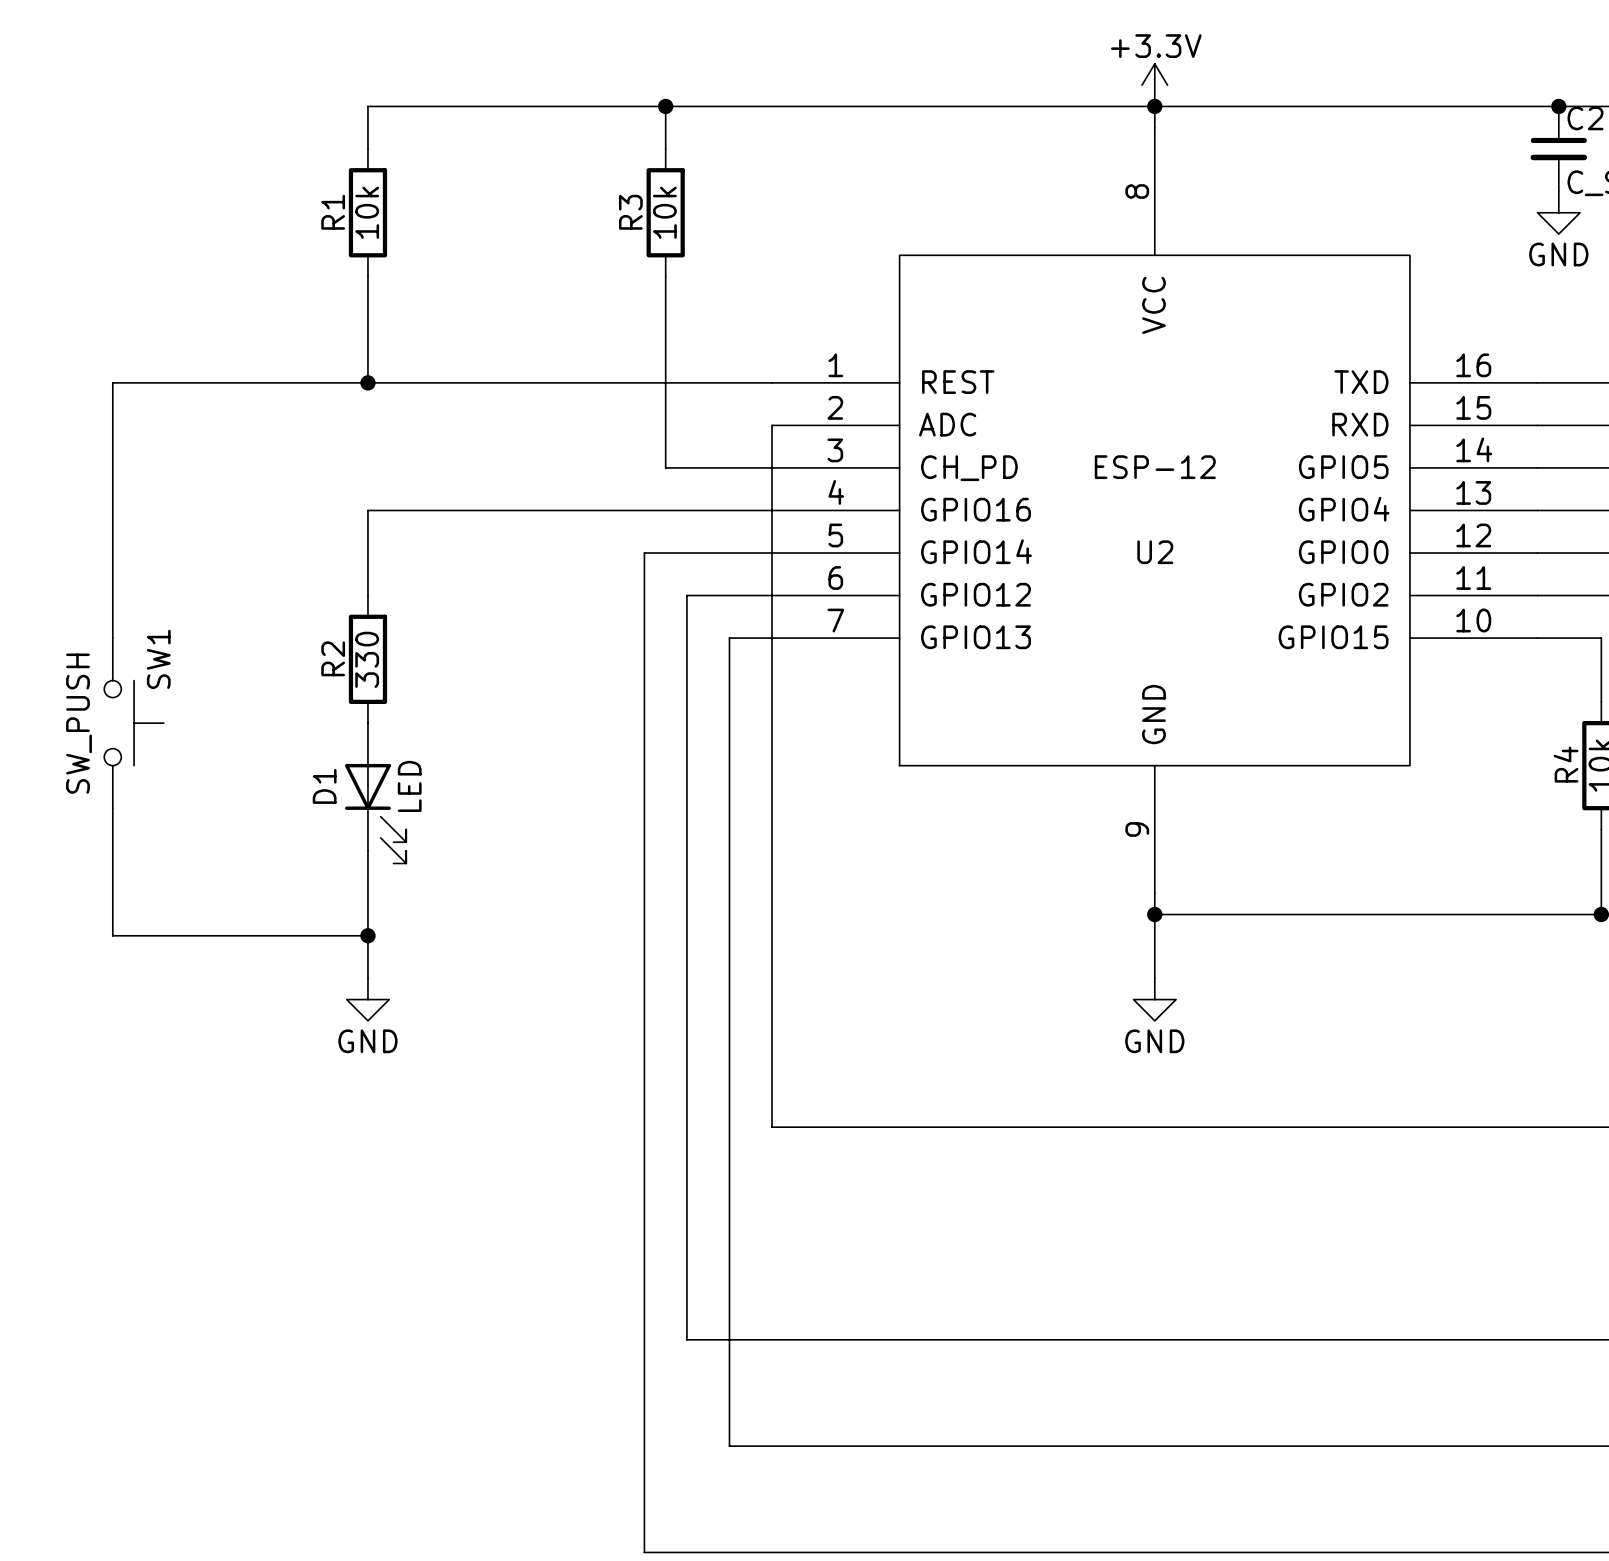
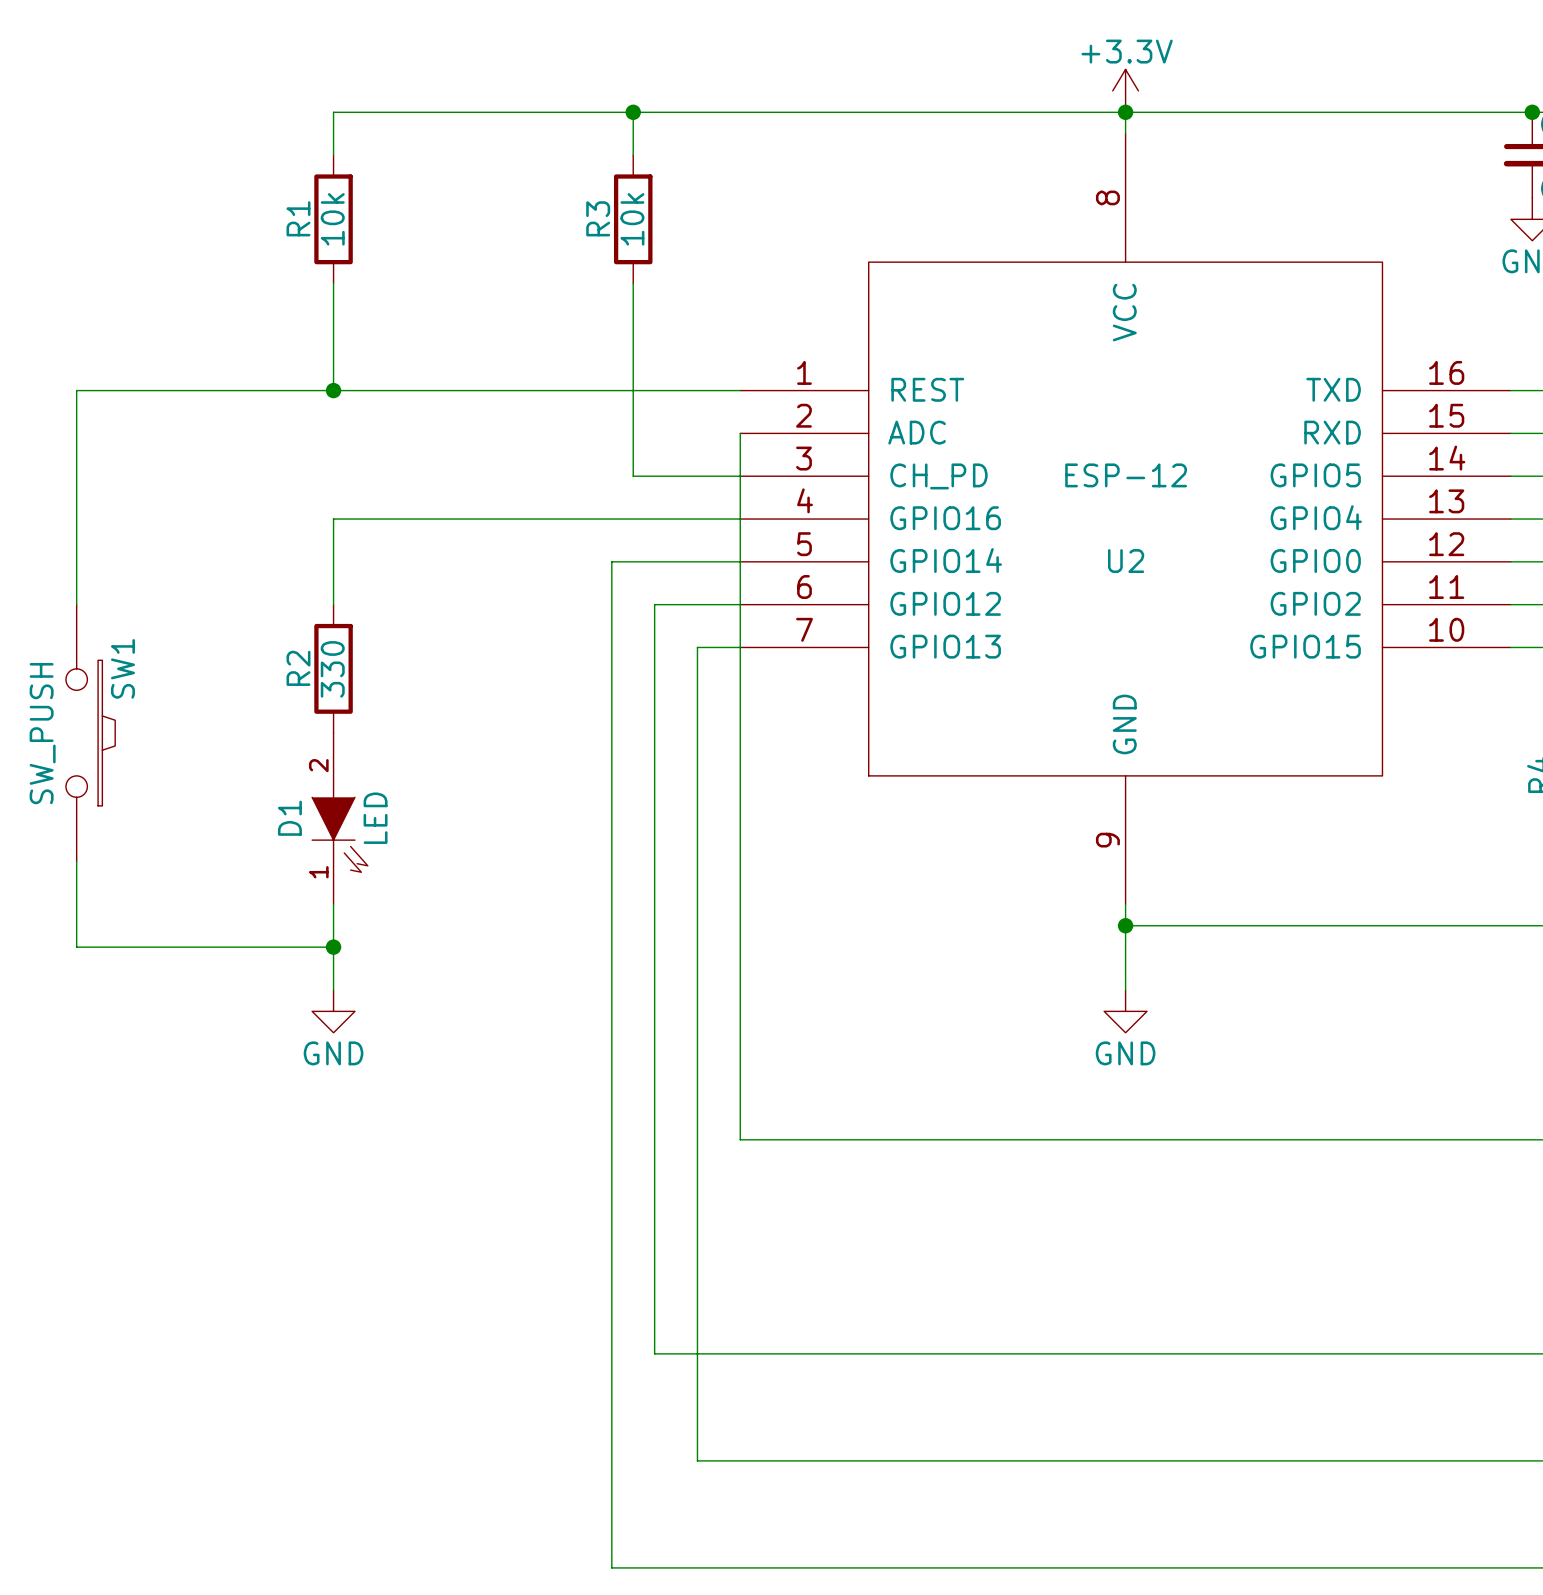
SW1 symbol: [104, 638, 164, 809] -> [65, 604, 116, 862]
D1 symbol: [345, 723, 407, 864] -> [312, 733, 368, 905]

